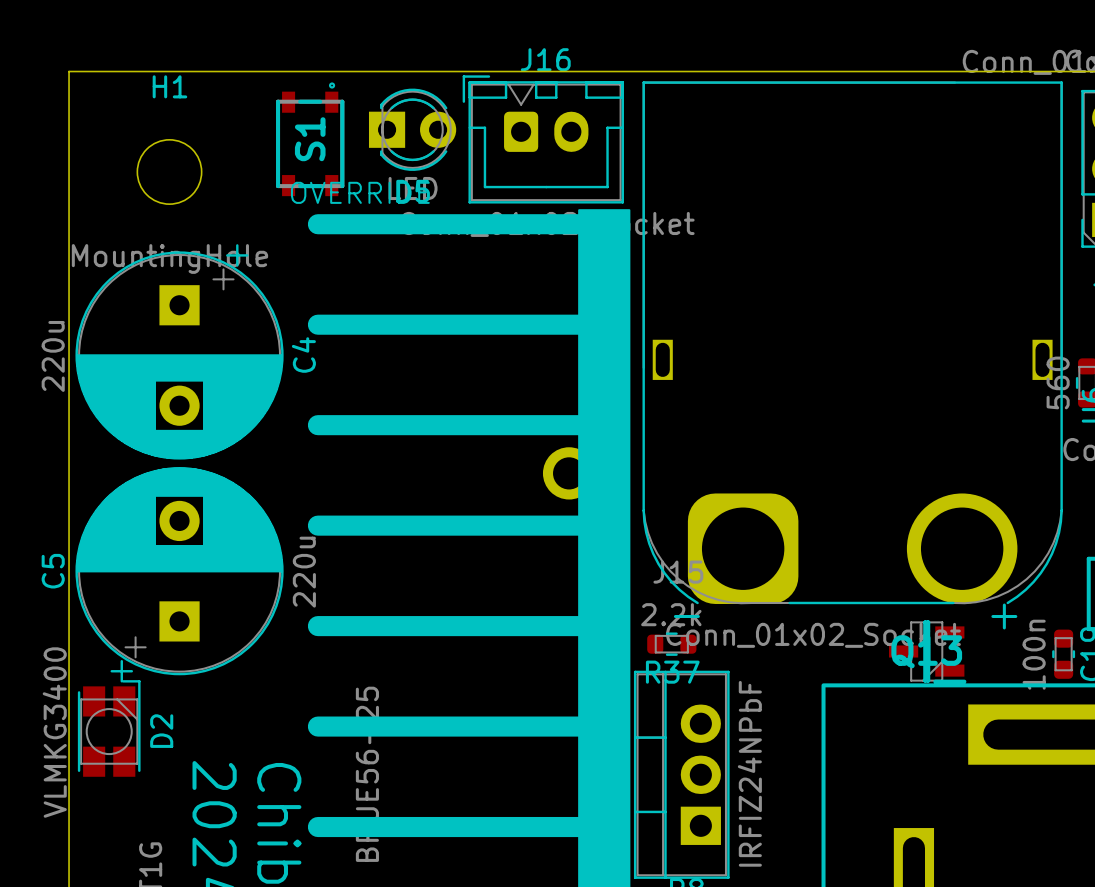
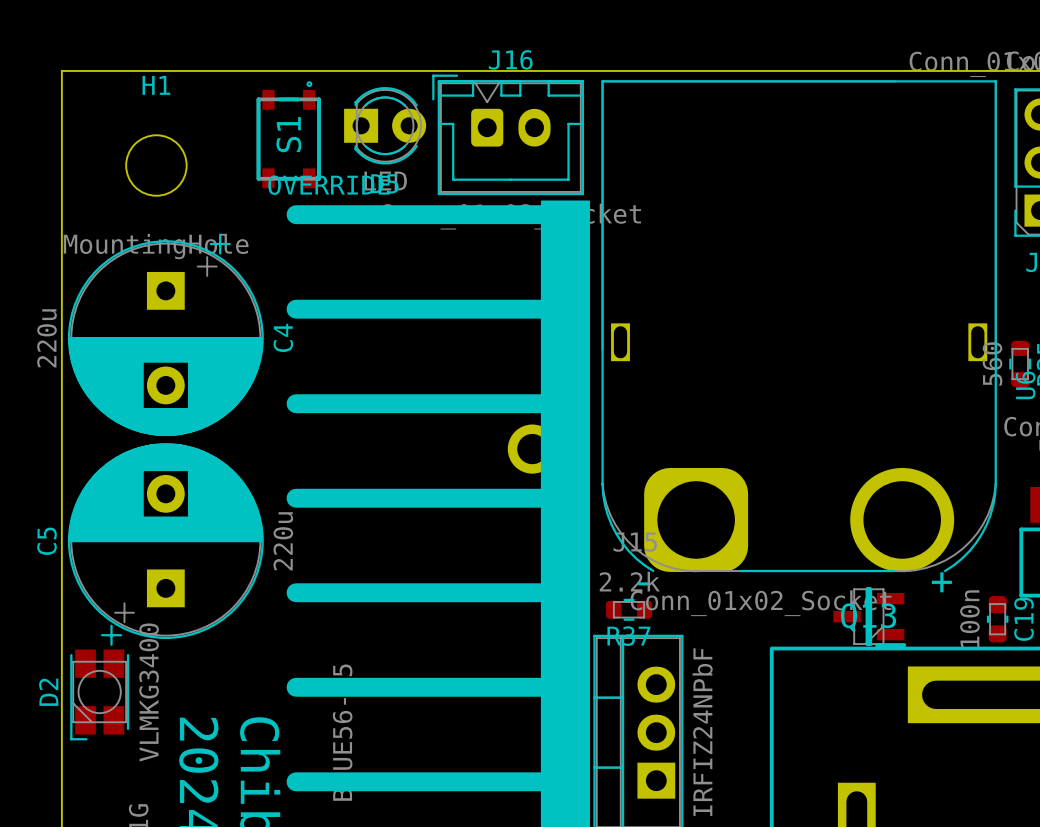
D2 rotation: 0° (109, 728) -> 180° (99, 694)

